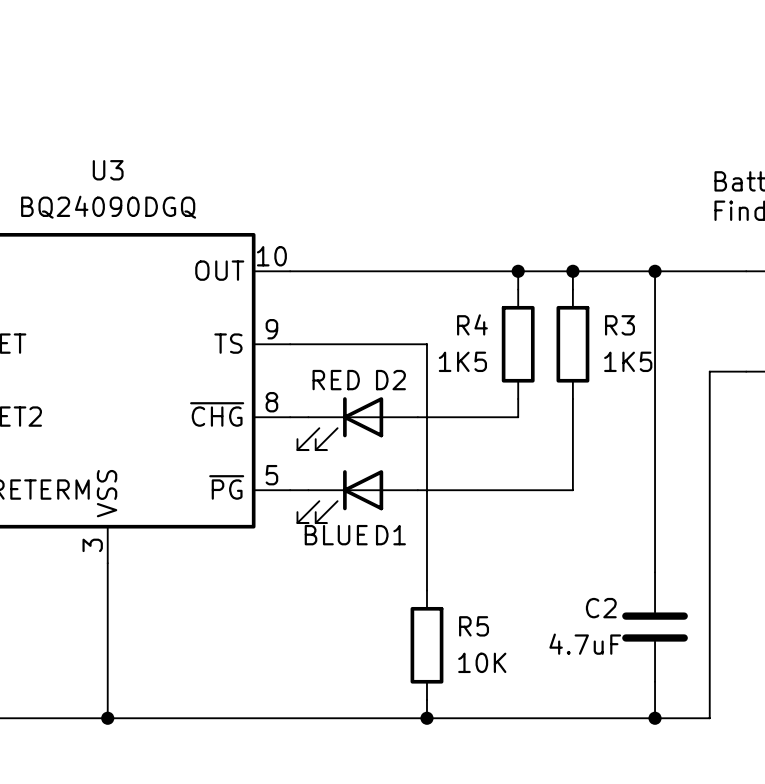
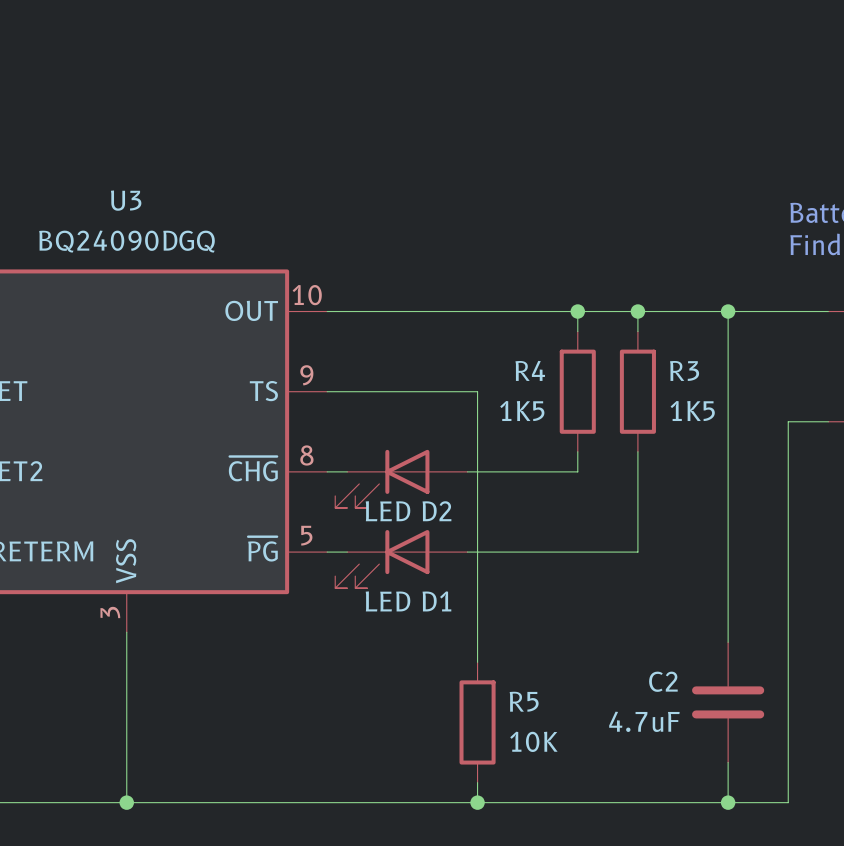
D2 value: RED (336, 380) -> LED (388, 511)
D2 name position: D2 (390, 380) -> D2 (436, 511)
D1 value: BLUE (336, 535) -> LED (388, 601)

